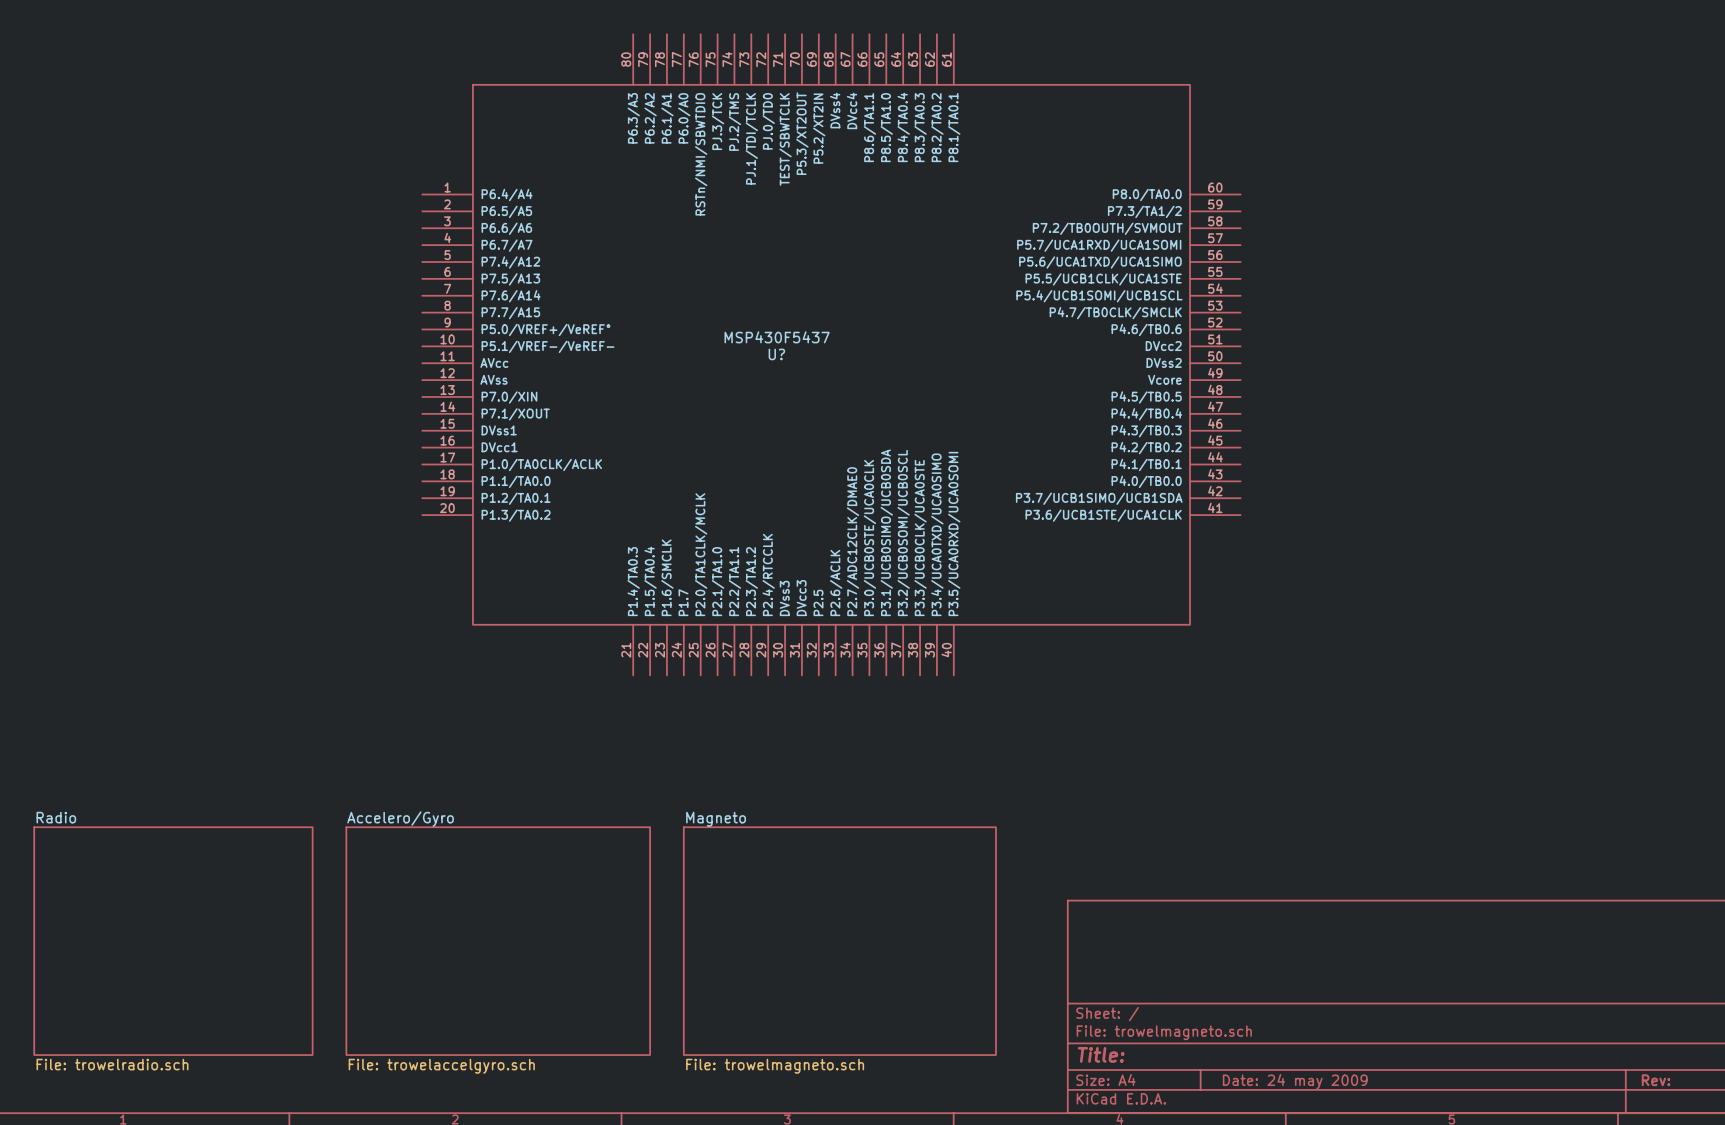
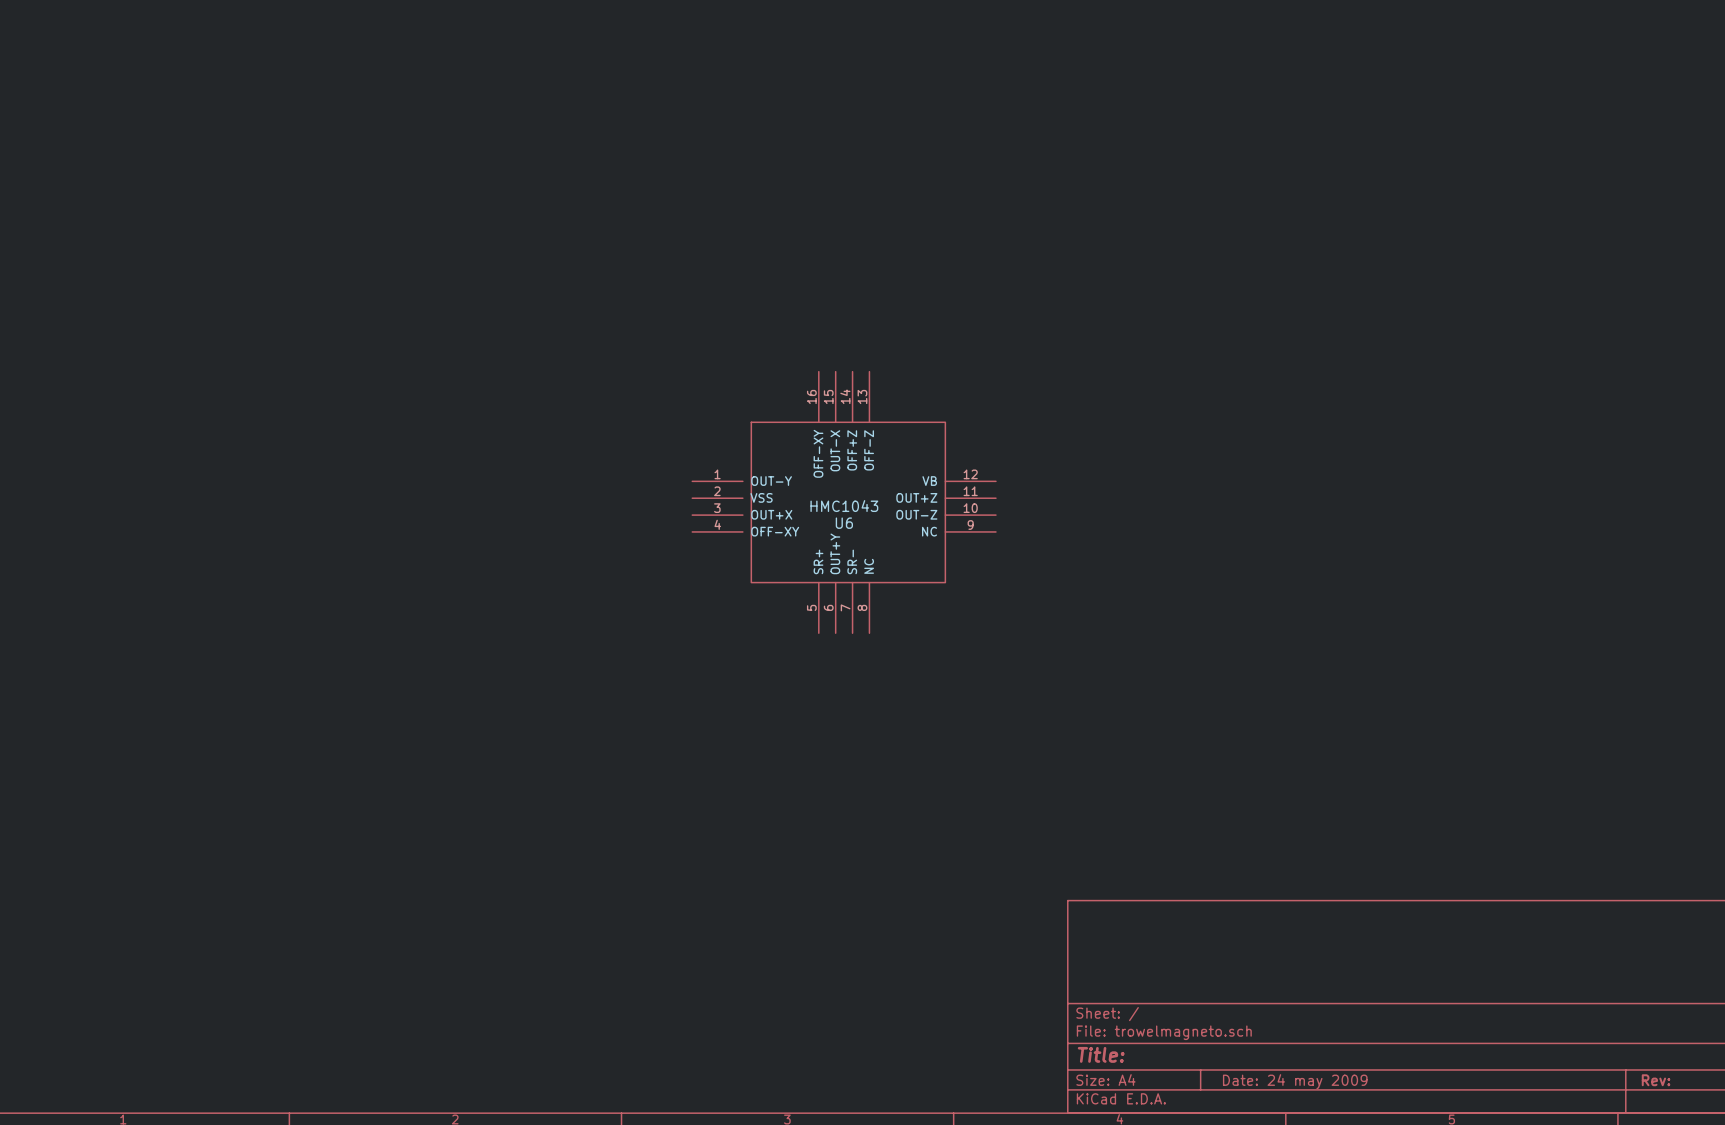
U?: MSP430F5437 (831, 354) -> none
U6: none -> HMC1043 (844, 502)
sheet Radio: File: trowelradio.sch (173, 941) -> none
sheet Accelero/Gyro: File: trowelaccelgyro.sch (498, 941) -> none
sheet Magneto: File: trowelmagneto.sch (839, 941) -> none

